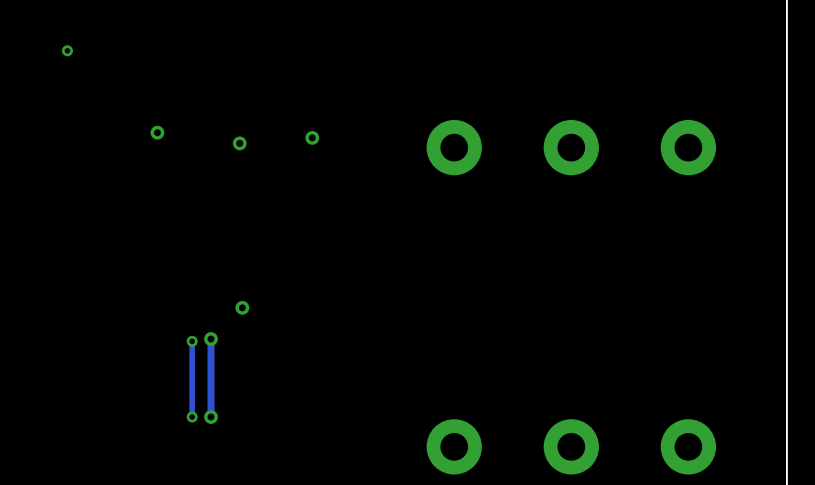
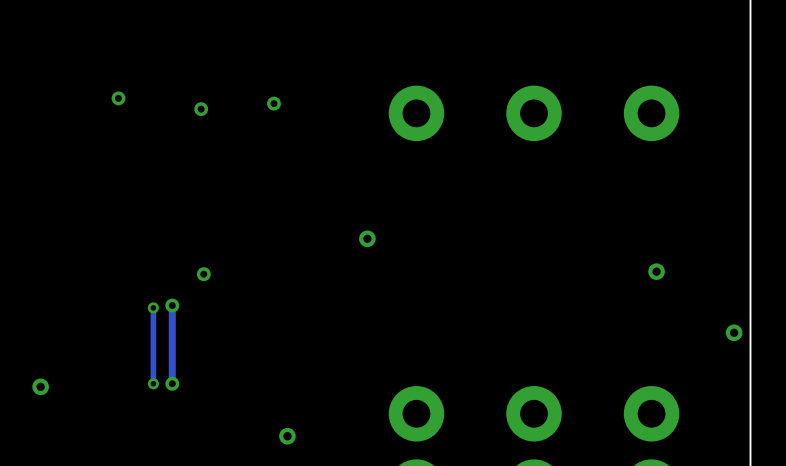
via: (67, 50) -> none
via: none -> (367, 238)
via: none -> (656, 271)
via: none -> (734, 332)
via: none -> (40, 386)
via: none -> (287, 436)

